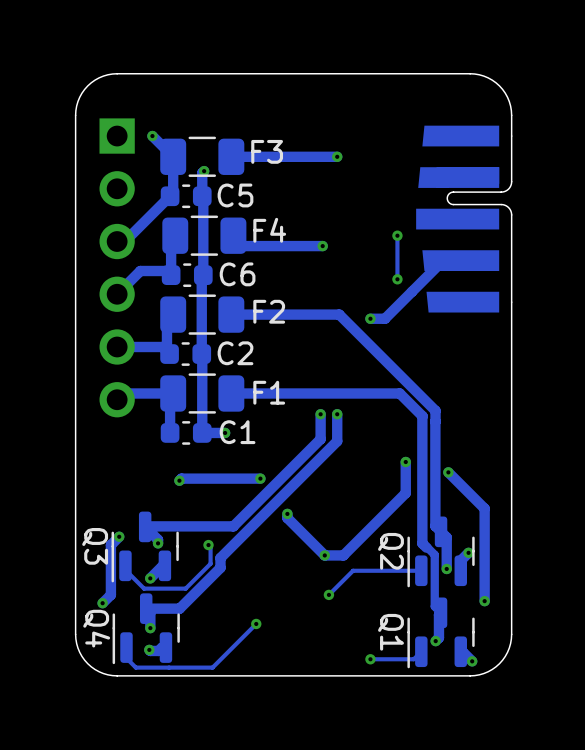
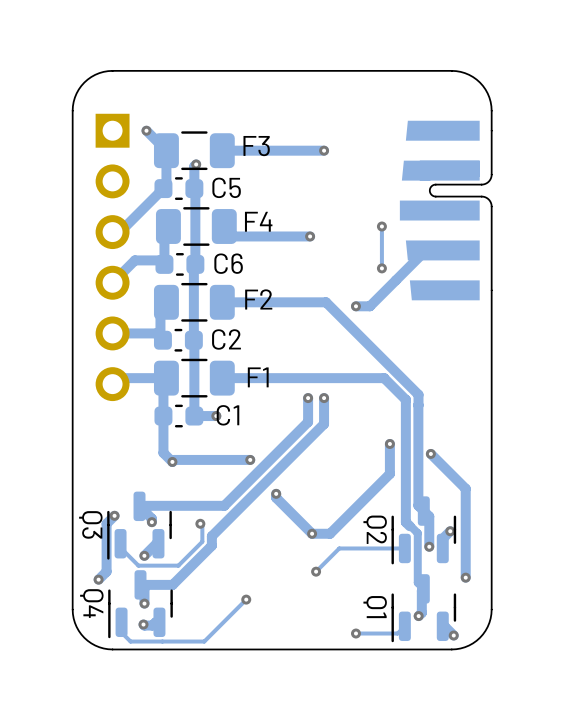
track: none -> (163, 416) (163, 452) (172, 461)

